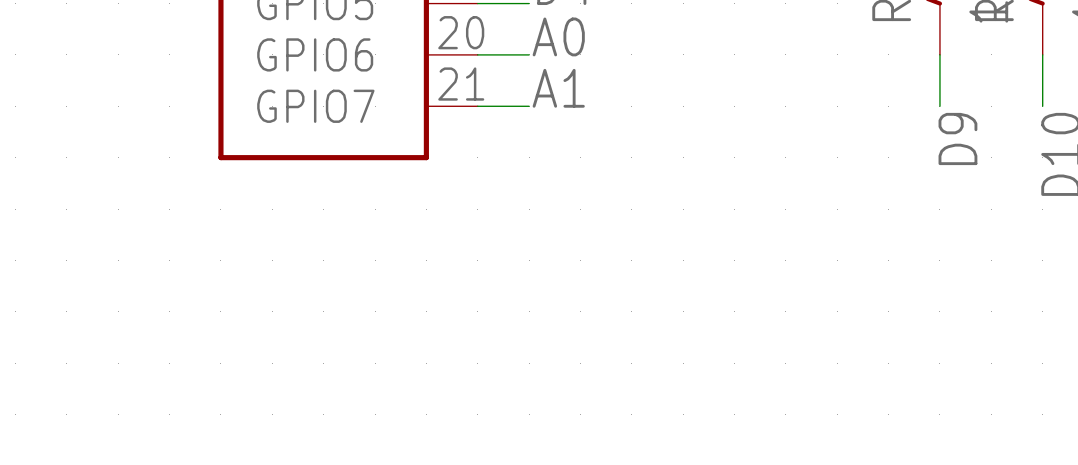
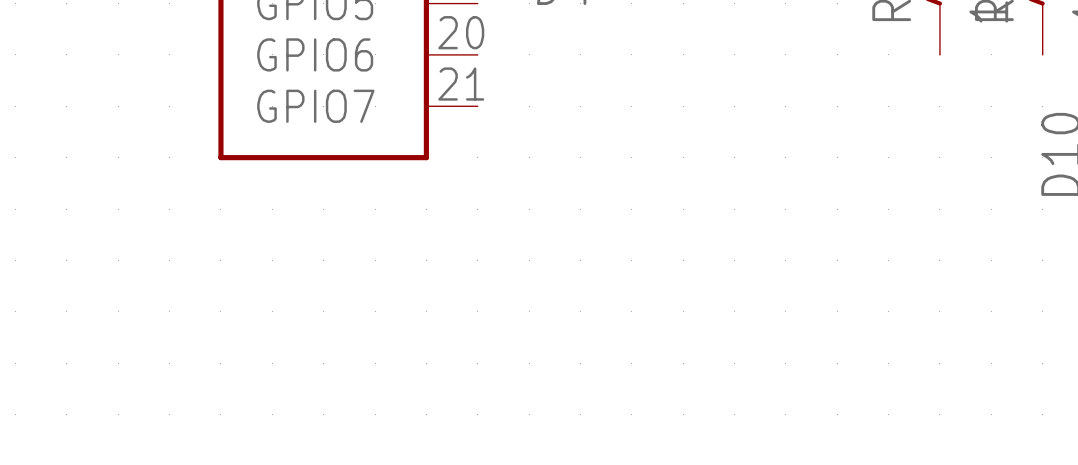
wire: (477, 3) (529, 3) -> none
label: A0 (558, 36) -> none
wire: (477, 54) (529, 54) -> none
wire: (939, 54) (939, 106) -> none
wire: (1042, 54) (1042, 106) -> none
label: A1 (558, 88) -> none
wire: (477, 106) (529, 106) -> none
label: D9 (957, 138) -> none

